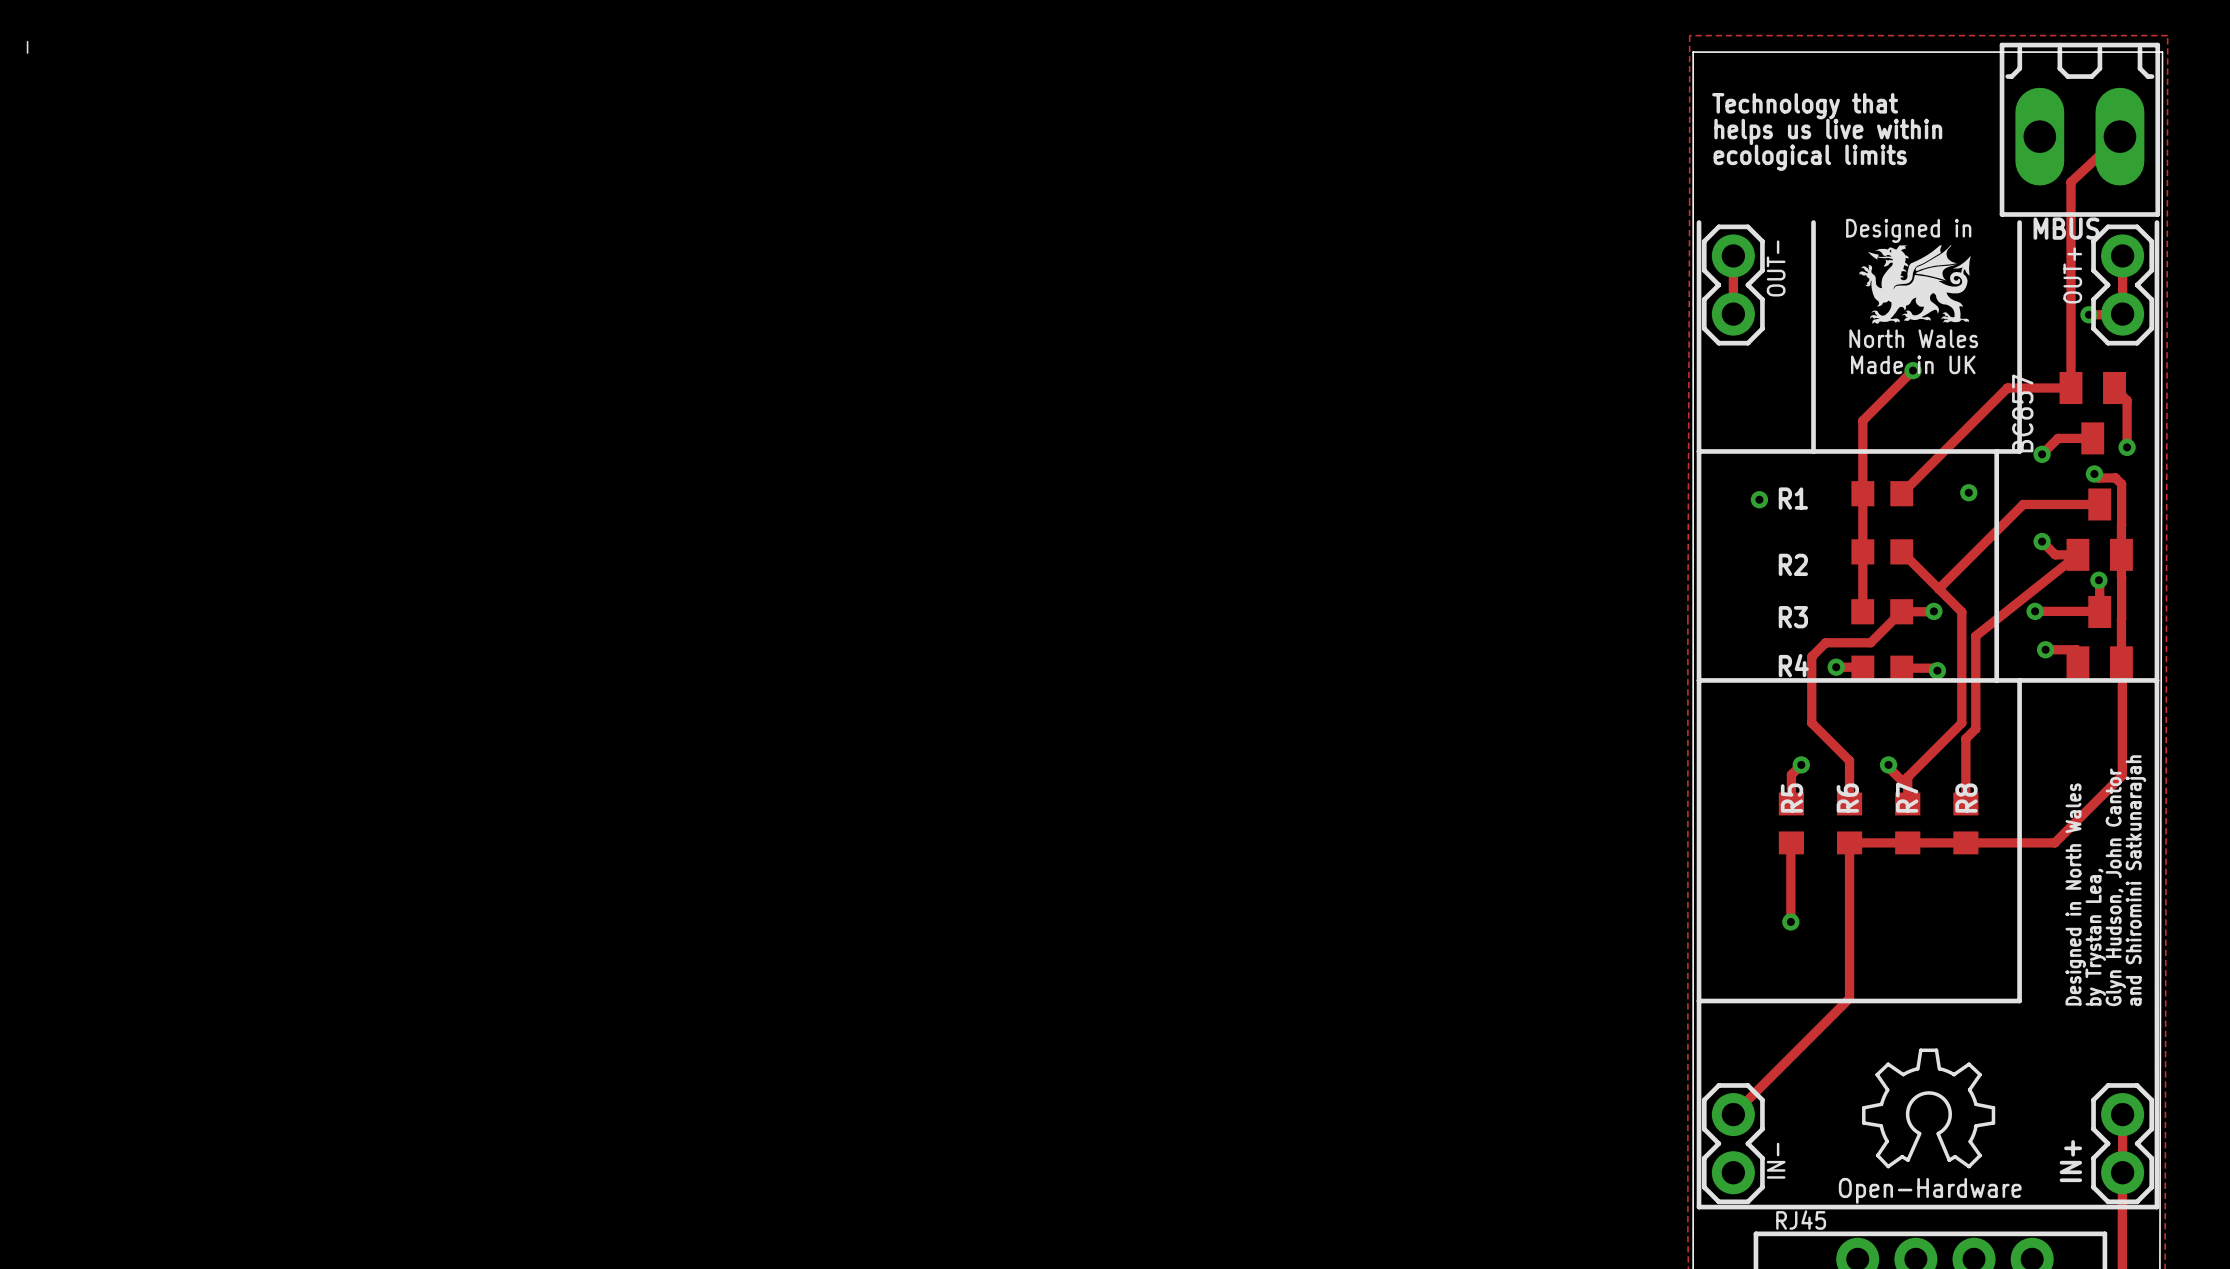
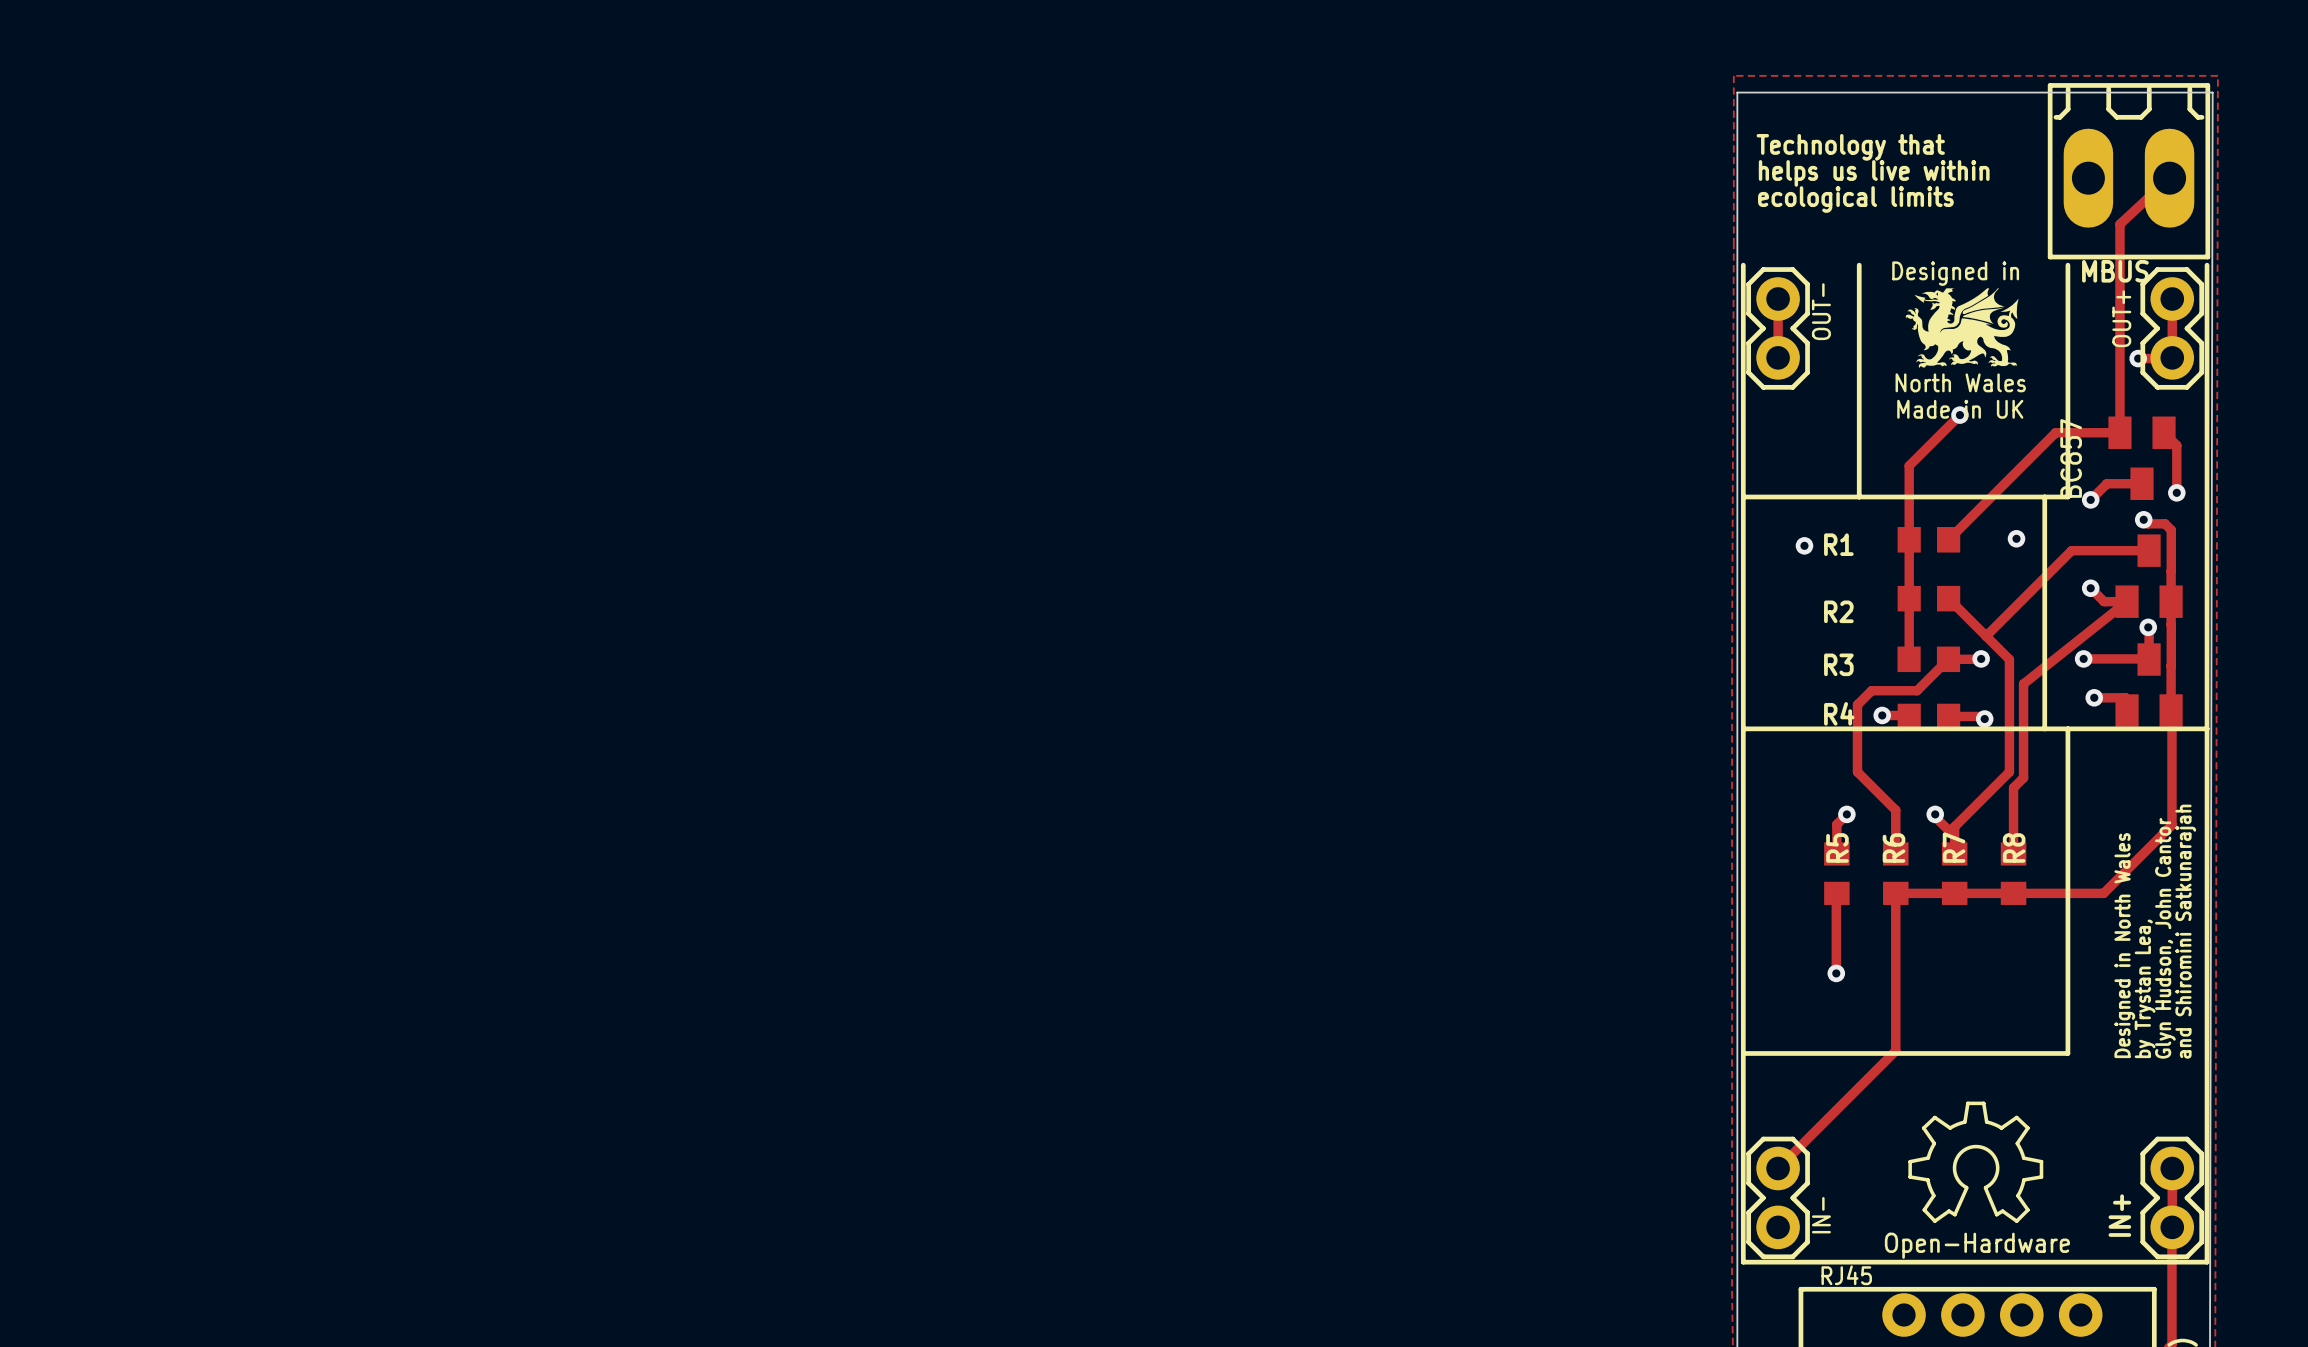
line: (27, 41) (27, 53) -> none

